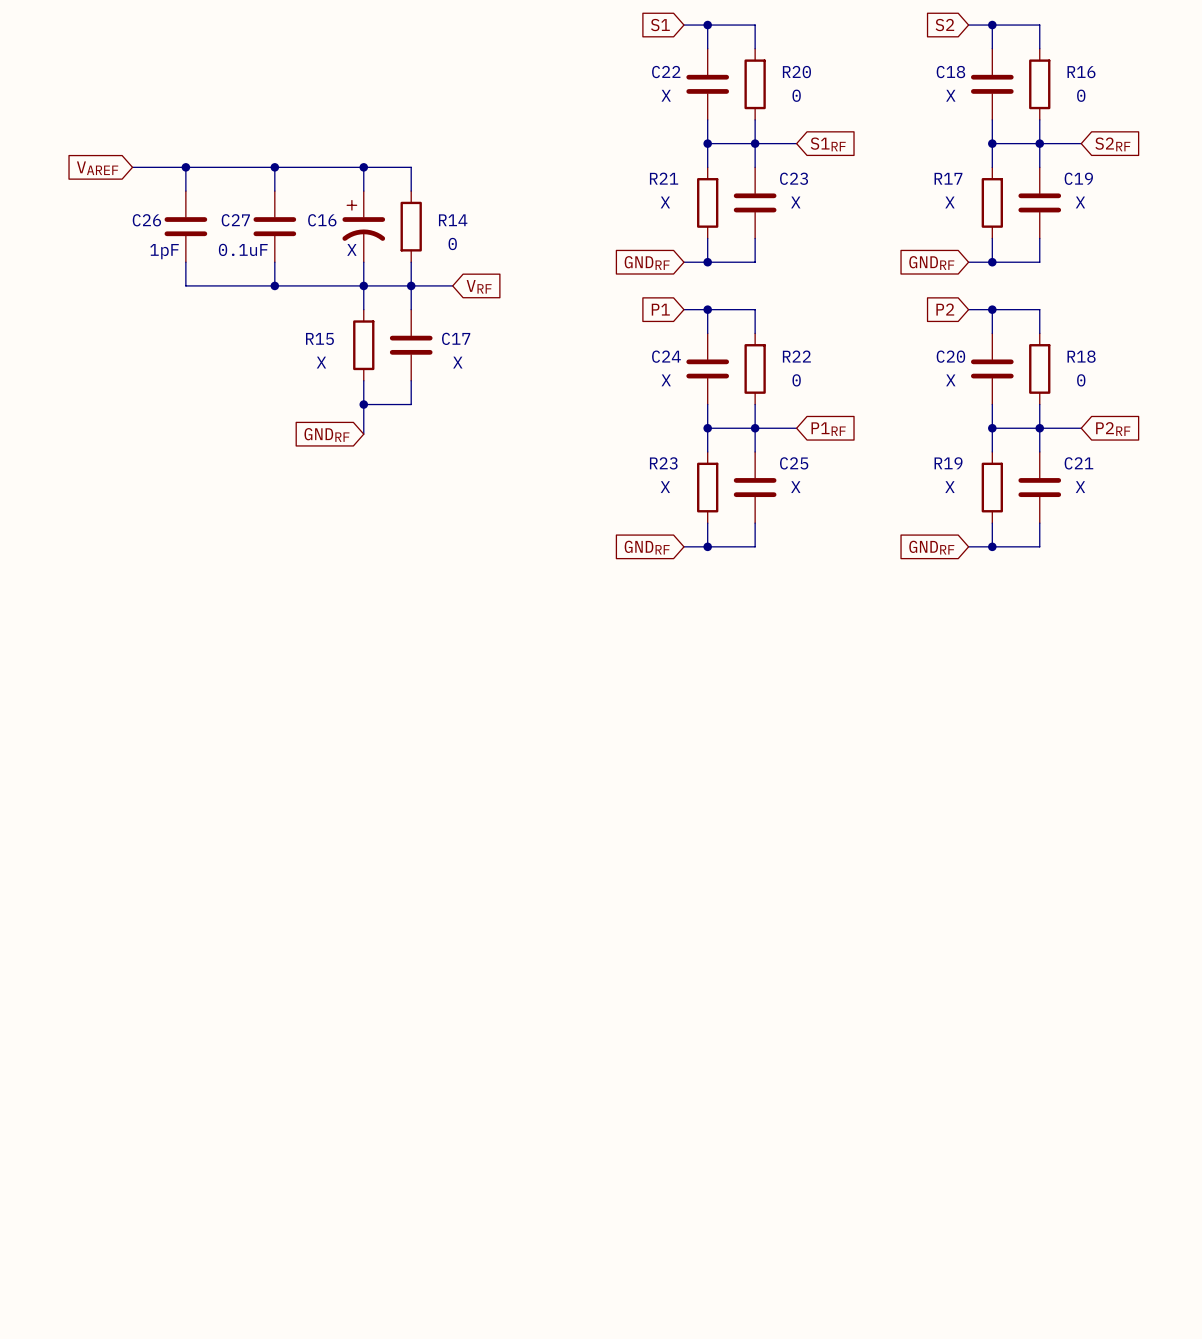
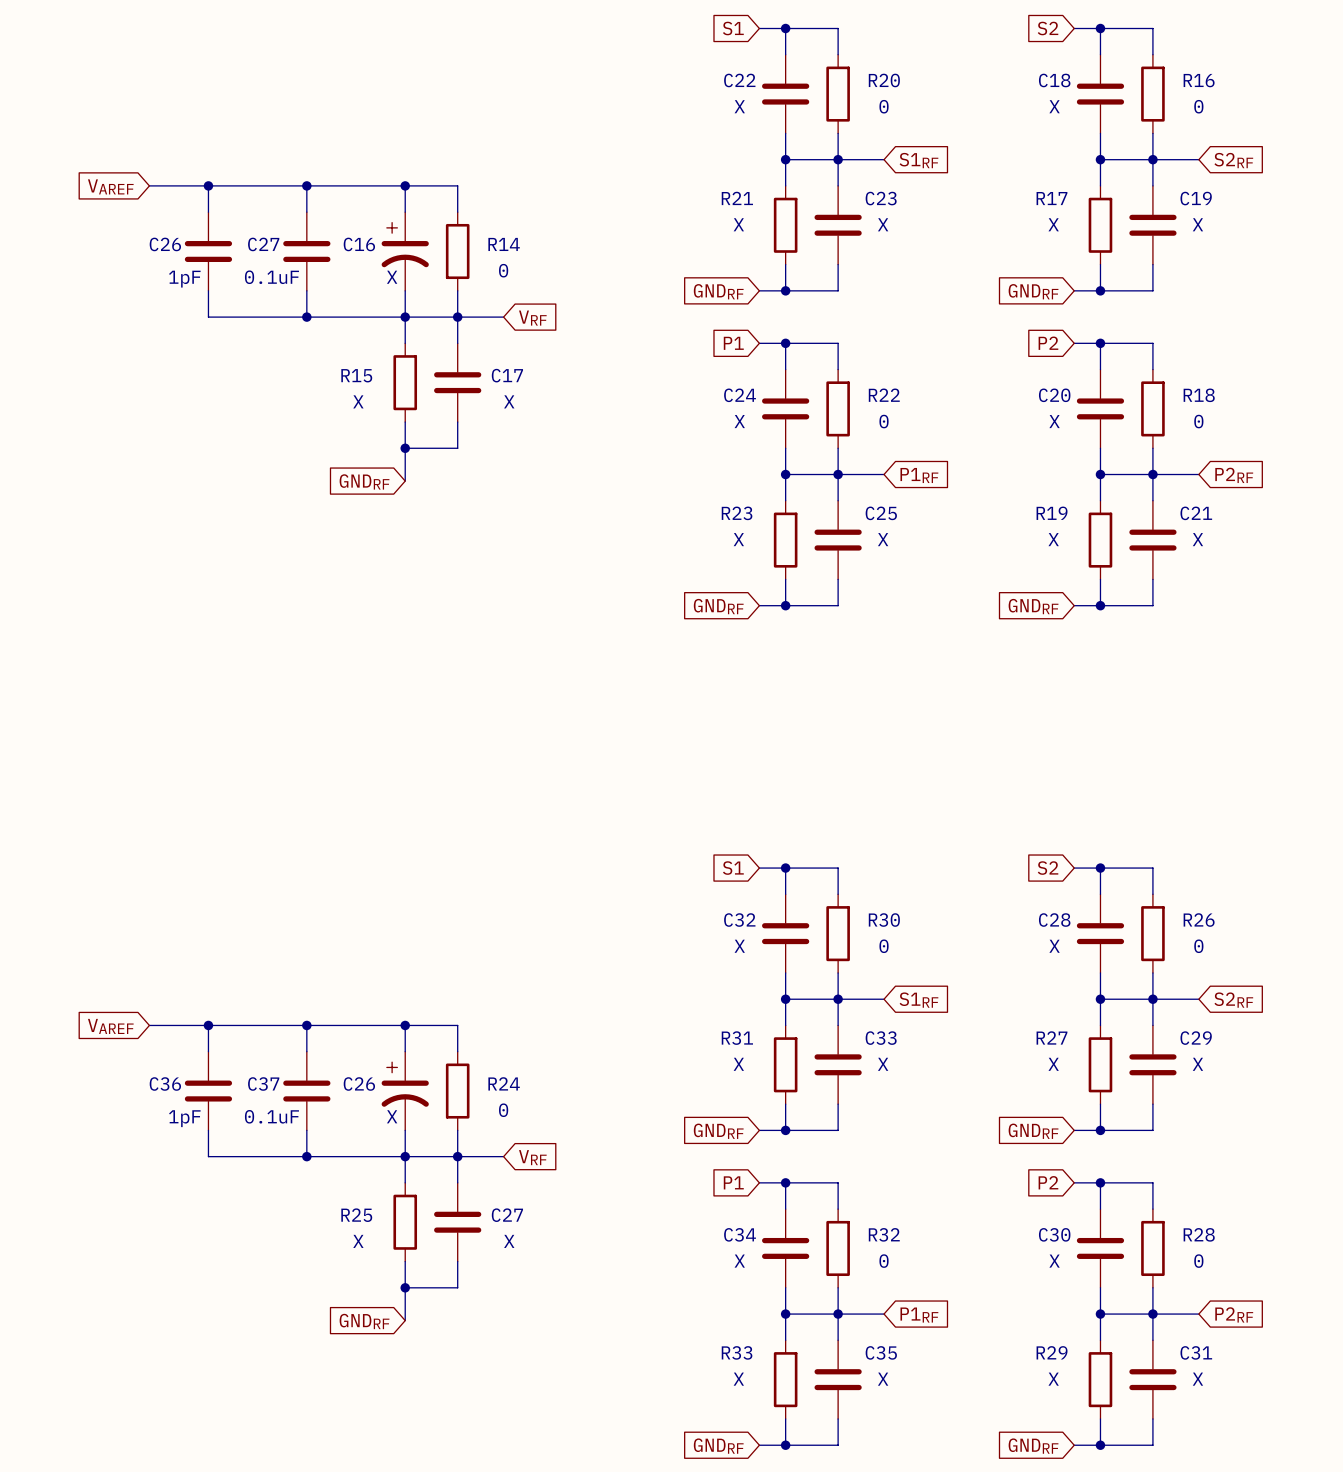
global label: none -> S1 (733, 868)
wire: none -> (759, 868) (838, 868) (838, 894)
wire: none -> (785, 868) (785, 894)
junction: none -> (785, 868)
global label: none -> S2 (1048, 868)
wire: none -> (1074, 868) (1152, 868) (1152, 894)
wire: none -> (1100, 868) (1100, 894)
junction: none -> (1100, 868)
C32: none -> X (785, 933)
R30: none -> 0 (838, 933)
C28: none -> X (1100, 933)
R26: none -> 0 (1152, 933)
wire: none -> (785, 972) (785, 1025)
wire: none -> (838, 972) (838, 1025)
wire: none -> (1100, 972) (1100, 1025)
wire: none -> (1152, 972) (1152, 1025)
wire: none -> (785, 999) (884, 999)
junction: none -> (785, 999)
junction: none -> (838, 999)
wire: none -> (1100, 999) (1198, 999)
junction: none -> (1100, 999)
junction: none -> (1152, 999)
global label: none -> S1RF (918, 1000)
global label: none -> S2RF (1233, 1000)
wire: none -> (149, 1025) (457, 1025) (457, 1051)
wire: none -> (208, 1025) (208, 1051)
junction: none -> (208, 1025)
wire: none -> (306, 1025) (306, 1051)
junction: none -> (306, 1025)
wire: none -> (405, 1025) (405, 1051)
junction: none -> (405, 1025)
global label: none -> VAREF (110, 1026)
R31: none -> X (785, 1064)
C33: none -> X (838, 1064)
R27: none -> X (1100, 1064)
C29: none -> X (1152, 1064)
C36: none -> 1pF (208, 1091)
C37: none -> 0.1uF (306, 1091)
C26: none -> X (405, 1091)
R24: none -> 0 (457, 1091)
wire: none -> (785, 1104) (785, 1130)
wire: none -> (838, 1104) (838, 1130) (759, 1130)
wire: none -> (1100, 1104) (1100, 1130)
wire: none -> (1152, 1104) (1152, 1130) (1074, 1130)
wire: none -> (208, 1130) (208, 1156) (503, 1156)
wire: none -> (306, 1130) (306, 1156)
wire: none -> (405, 1130) (405, 1182)
wire: none -> (457, 1130) (457, 1182)
junction: none -> (785, 1130)
junction: none -> (1100, 1130)
global label: none -> GNDRF (718, 1131)
global label: none -> GNDRF (1033, 1131)
junction: none -> (306, 1156)
junction: none -> (405, 1156)
junction: none -> (457, 1156)
global label: none -> VRF (532, 1157)
global label: none -> P1 (733, 1182)
wire: none -> (759, 1182) (838, 1182) (838, 1209)
wire: none -> (785, 1182) (785, 1209)
junction: none -> (785, 1182)
global label: none -> P2 (1048, 1182)
wire: none -> (1074, 1182) (1152, 1182) (1152, 1209)
wire: none -> (1100, 1182) (1100, 1209)
junction: none -> (1100, 1182)
R25: none -> X (405, 1222)
C27: none -> X (457, 1222)
C34: none -> X (785, 1248)
R32: none -> 0 (838, 1248)
C30: none -> X (1100, 1248)
R28: none -> 0 (1152, 1248)
wire: none -> (405, 1261) (405, 1320)
wire: none -> (457, 1261) (457, 1287) (405, 1287)
junction: none -> (405, 1287)
wire: none -> (785, 1287) (785, 1340)
wire: none -> (838, 1287) (838, 1340)
wire: none -> (1100, 1287) (1100, 1340)
wire: none -> (1152, 1287) (1152, 1340)
wire: none -> (785, 1314) (884, 1314)
junction: none -> (785, 1314)
junction: none -> (838, 1314)
wire: none -> (1100, 1314) (1198, 1314)
junction: none -> (1100, 1314)
junction: none -> (1152, 1314)
global label: none -> P1RF (919, 1315)
global label: none -> P2RF (1234, 1314)
global label: none -> GNDRF (364, 1321)
R33: none -> X (785, 1379)
C35: none -> X (838, 1379)
R29: none -> X (1100, 1379)
C31: none -> X (1152, 1379)
wire: none -> (785, 1418) (785, 1445)
wire: none -> (838, 1418) (838, 1445) (759, 1445)
wire: none -> (1100, 1418) (1100, 1445)
wire: none -> (1152, 1418) (1152, 1445) (1074, 1445)
junction: none -> (785, 1445)
junction: none -> (1100, 1445)
global label: none -> GNDRF (718, 1446)
global label: none -> GNDRF (1033, 1446)

